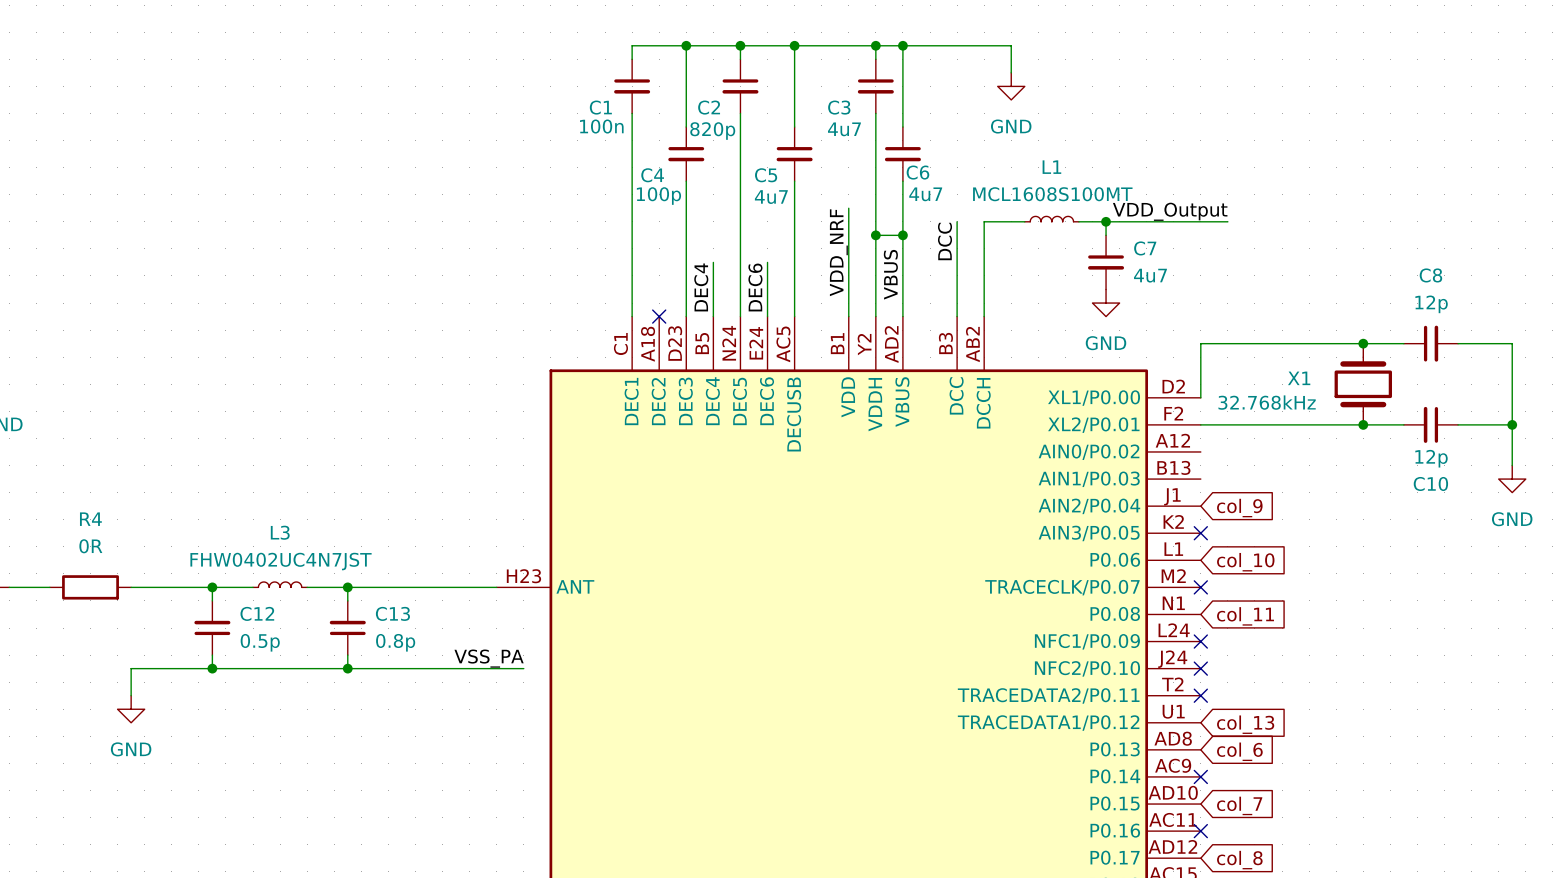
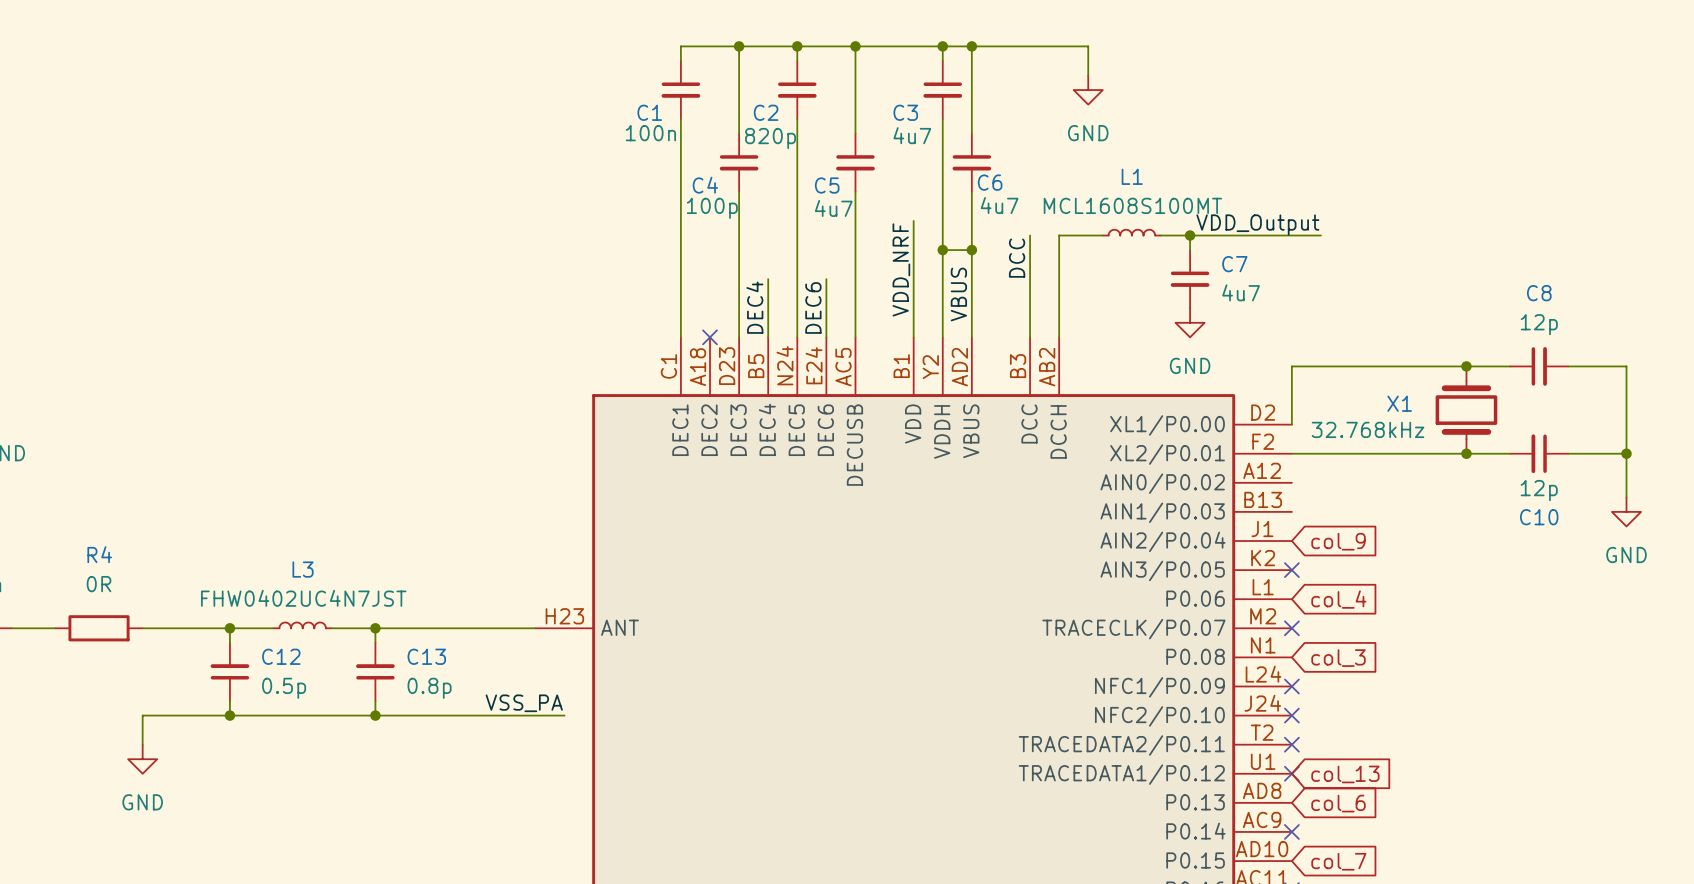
global label: col_10 (1245, 562) -> col_4 (1338, 599)
global label: col_11 (1245, 616) -> col_3 (1338, 658)
no-connect mark: none -> (1291, 773)

